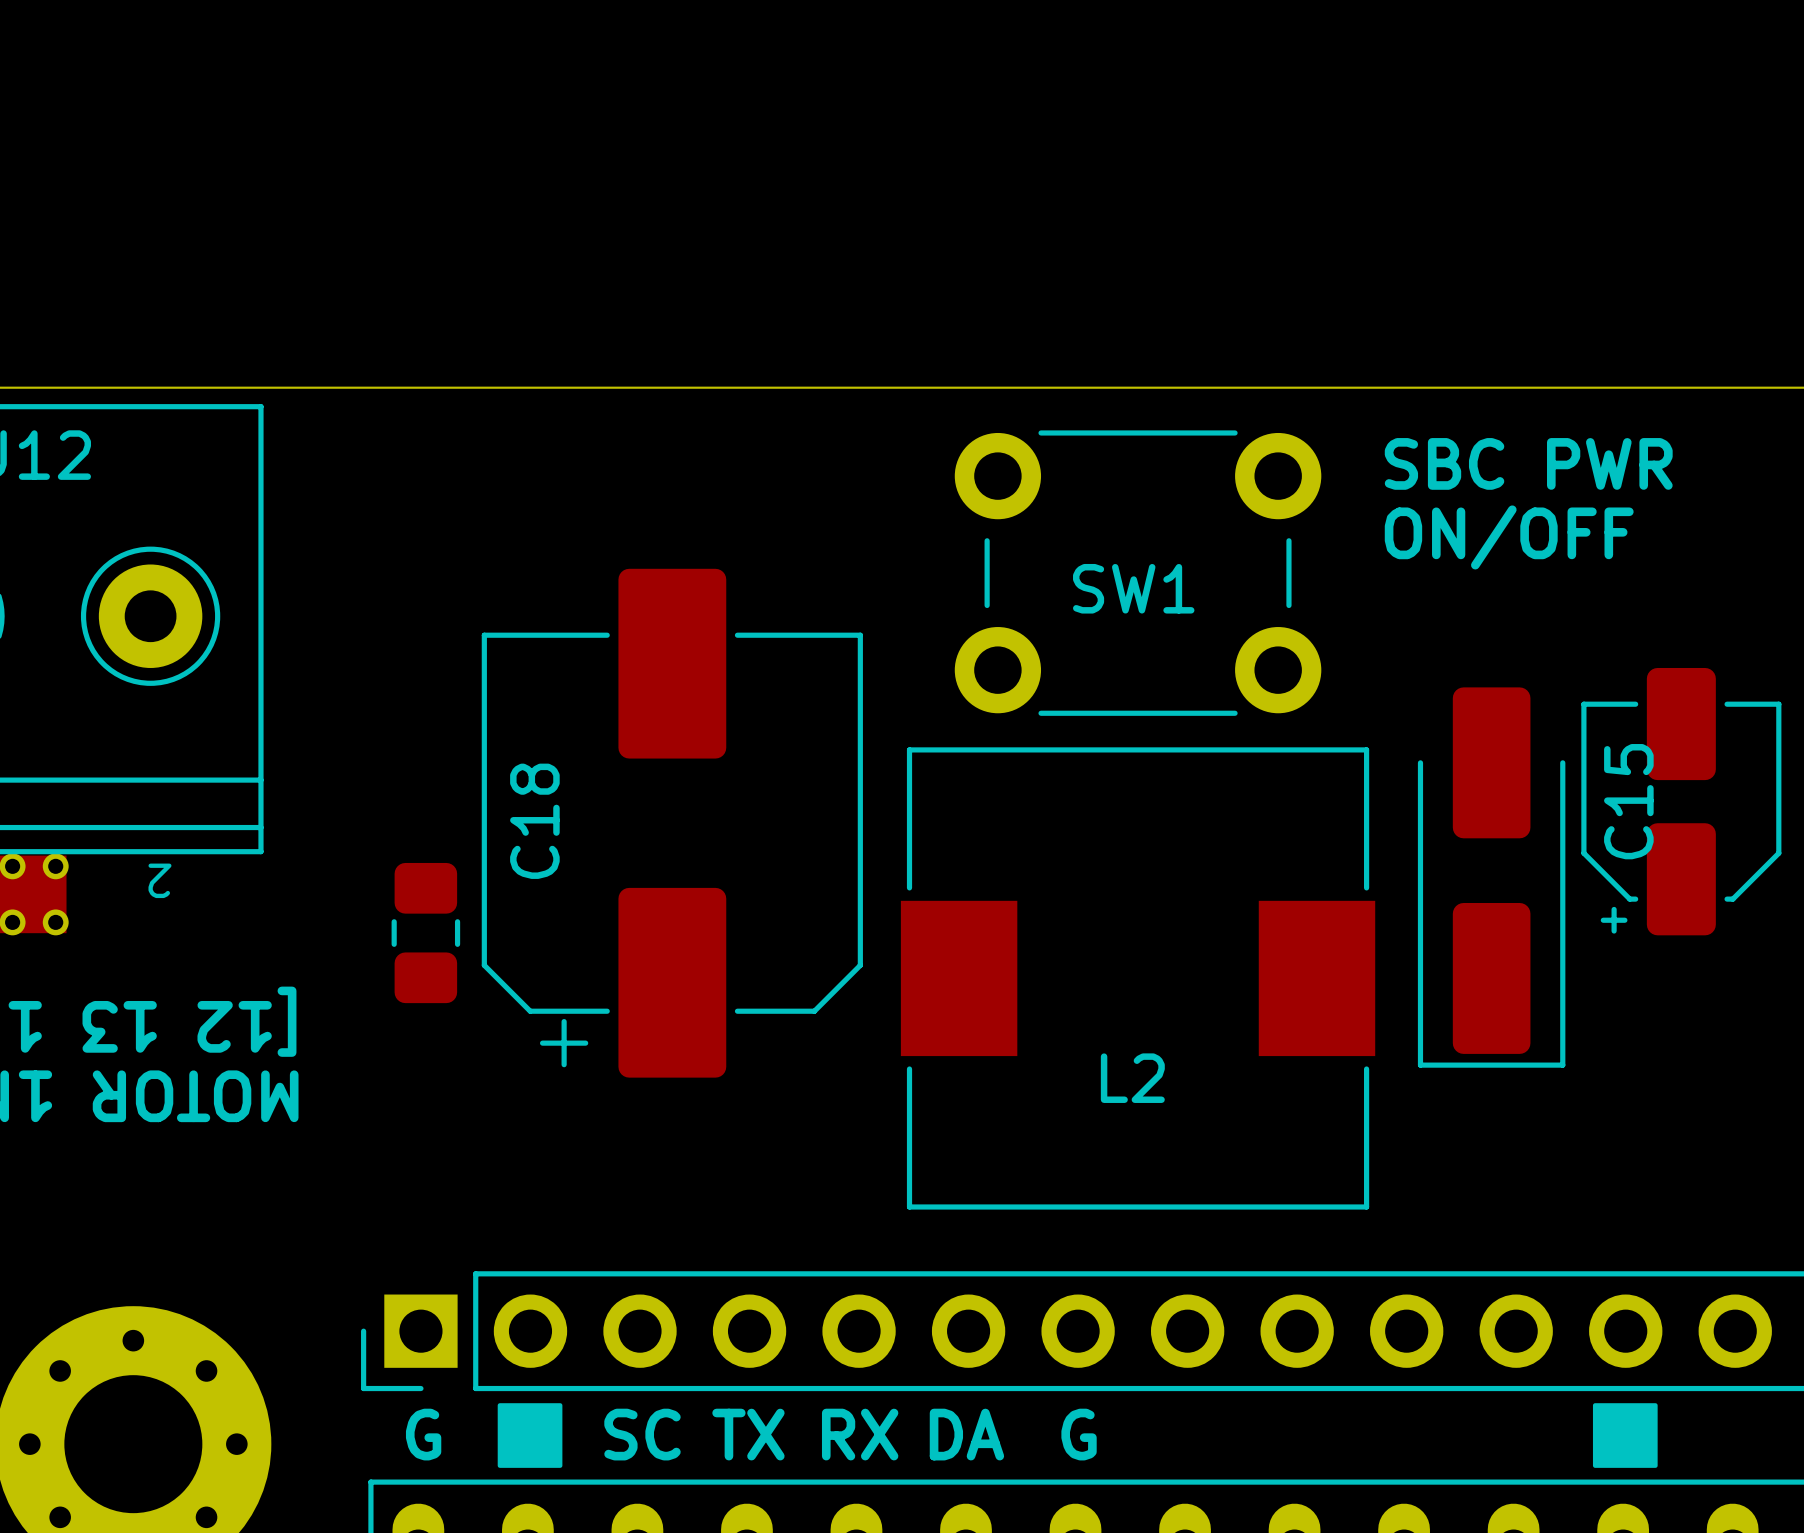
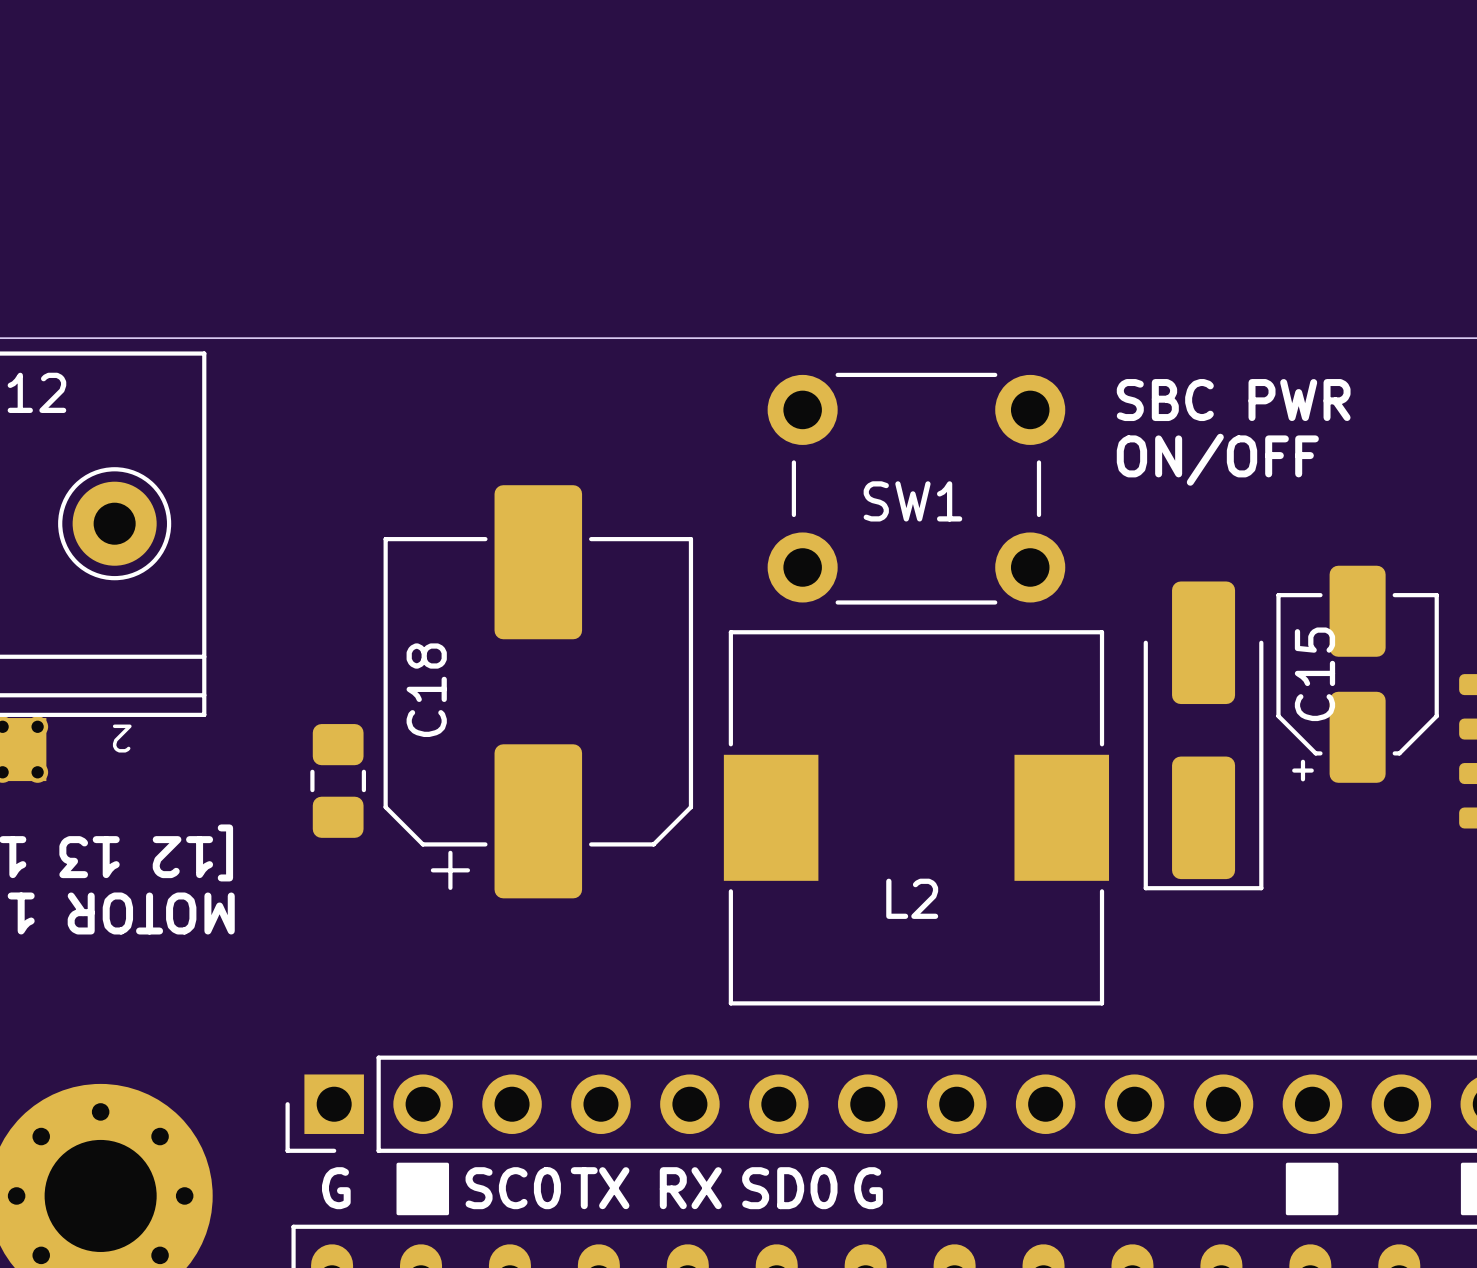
text: SC (642, 1434) -> SC0 (513, 1188)
text: DA (966, 1434) -> SD0 (789, 1188)

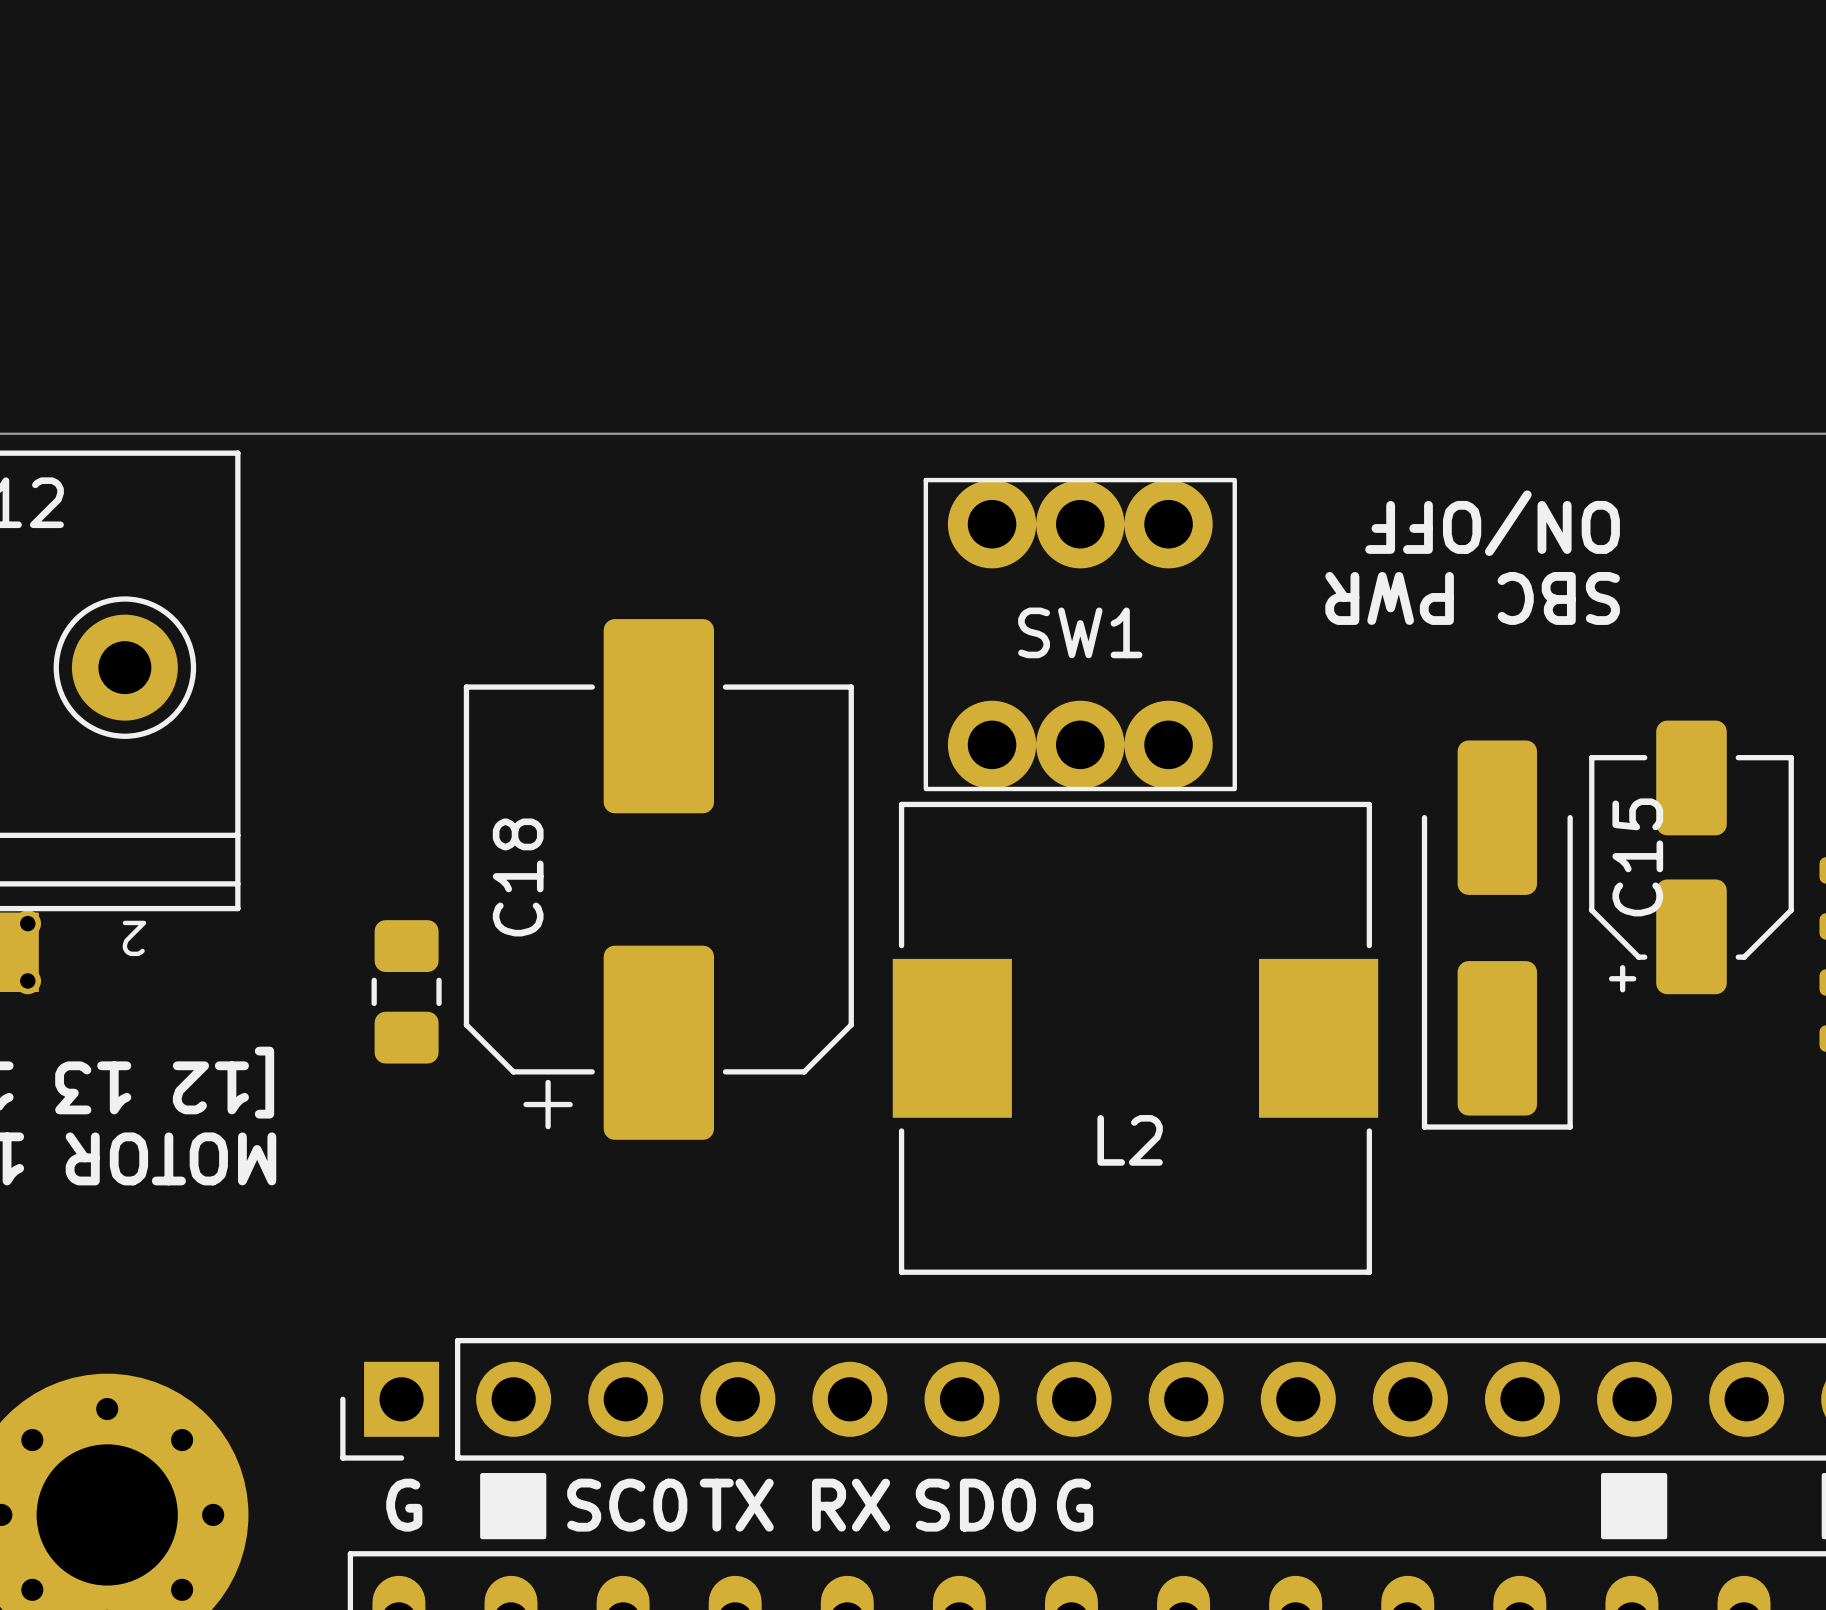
SW1 footprint: [767, 372, 1066, 605] -> [923, 477, 1237, 792]
text rotation: 0° (1233, 400) -> 180° (1472, 598)
text rotation: 0° (1217, 459) -> 180° (1492, 523)

